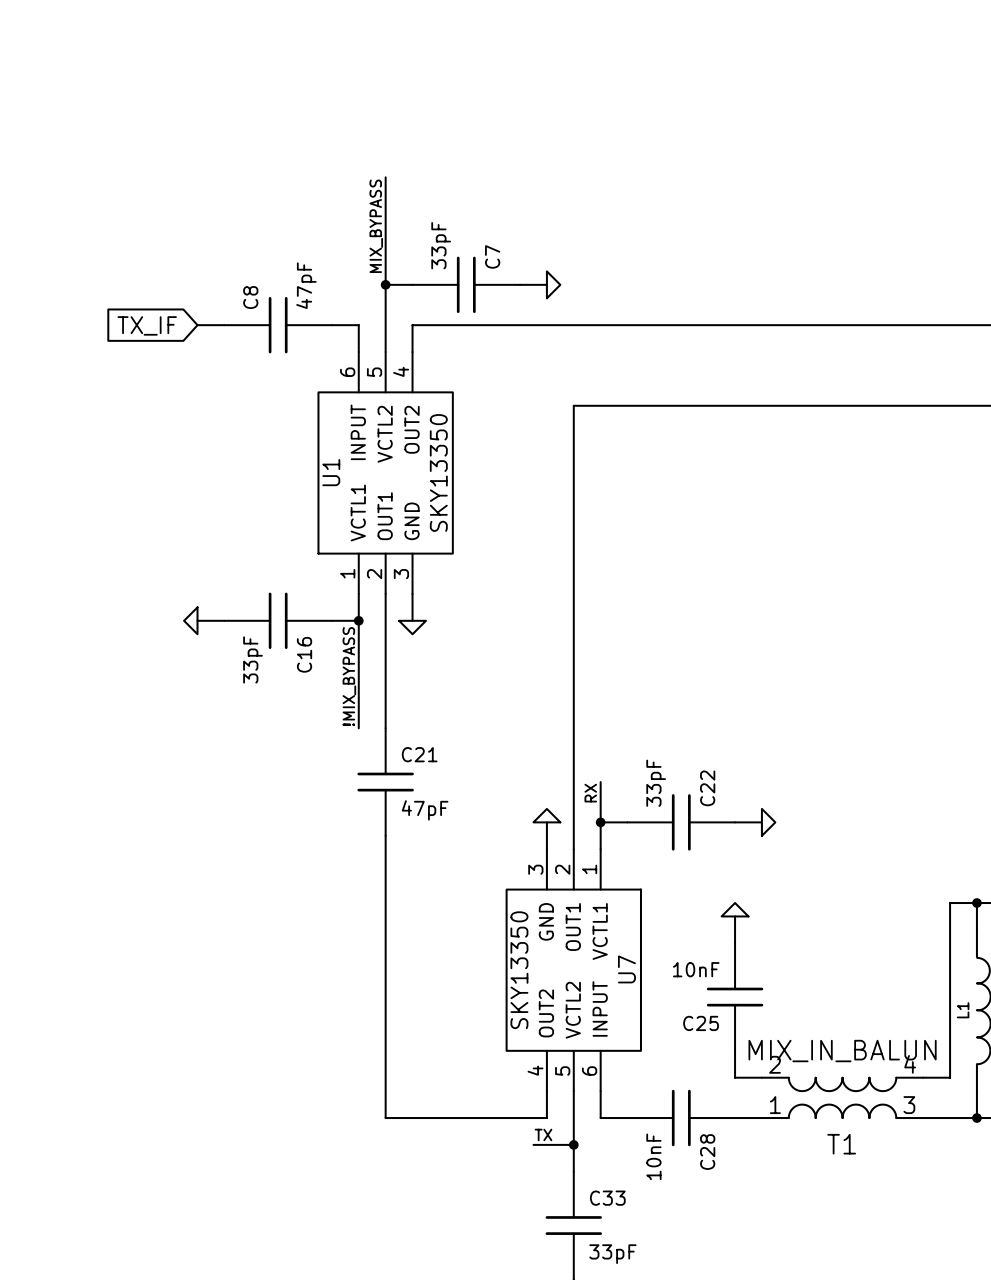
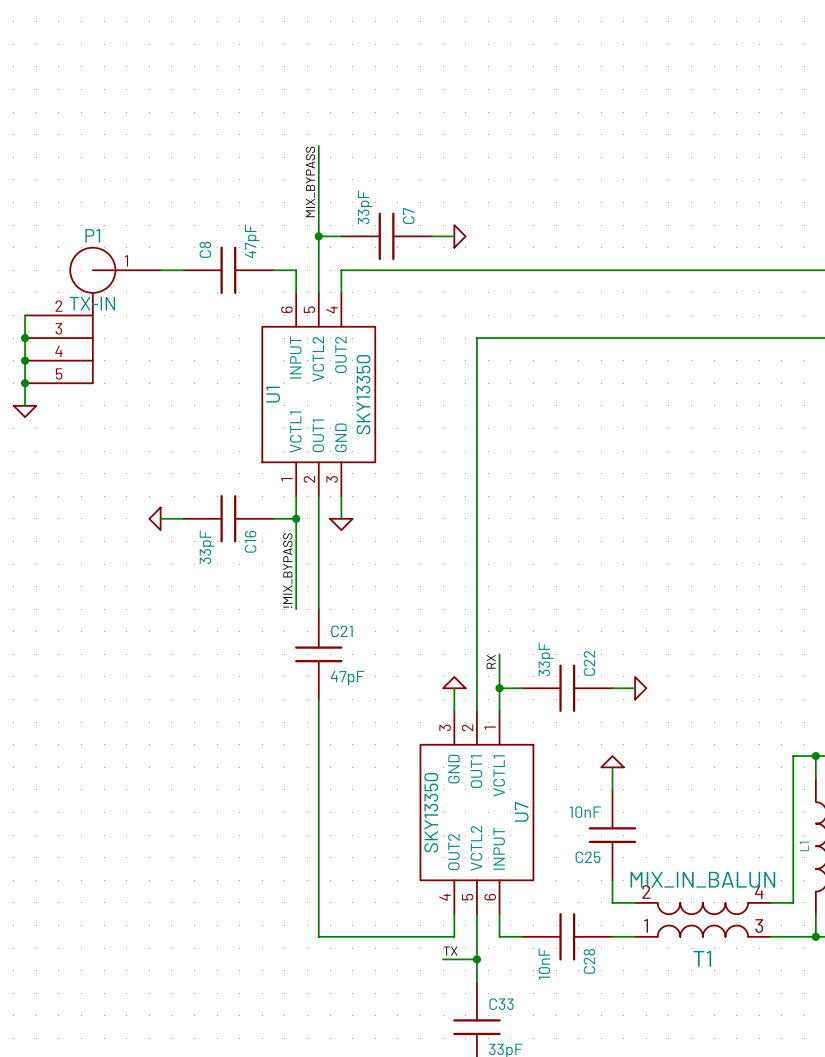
global label: TX_IF (147, 325) -> none
wire: none -> (25, 315) (25, 405)
P1: none -> TX-IN (92, 315)
junction: none -> (25, 338)
junction: none -> (25, 360)
junction: none -> (25, 383)
power symbol: none -> (25, 411)

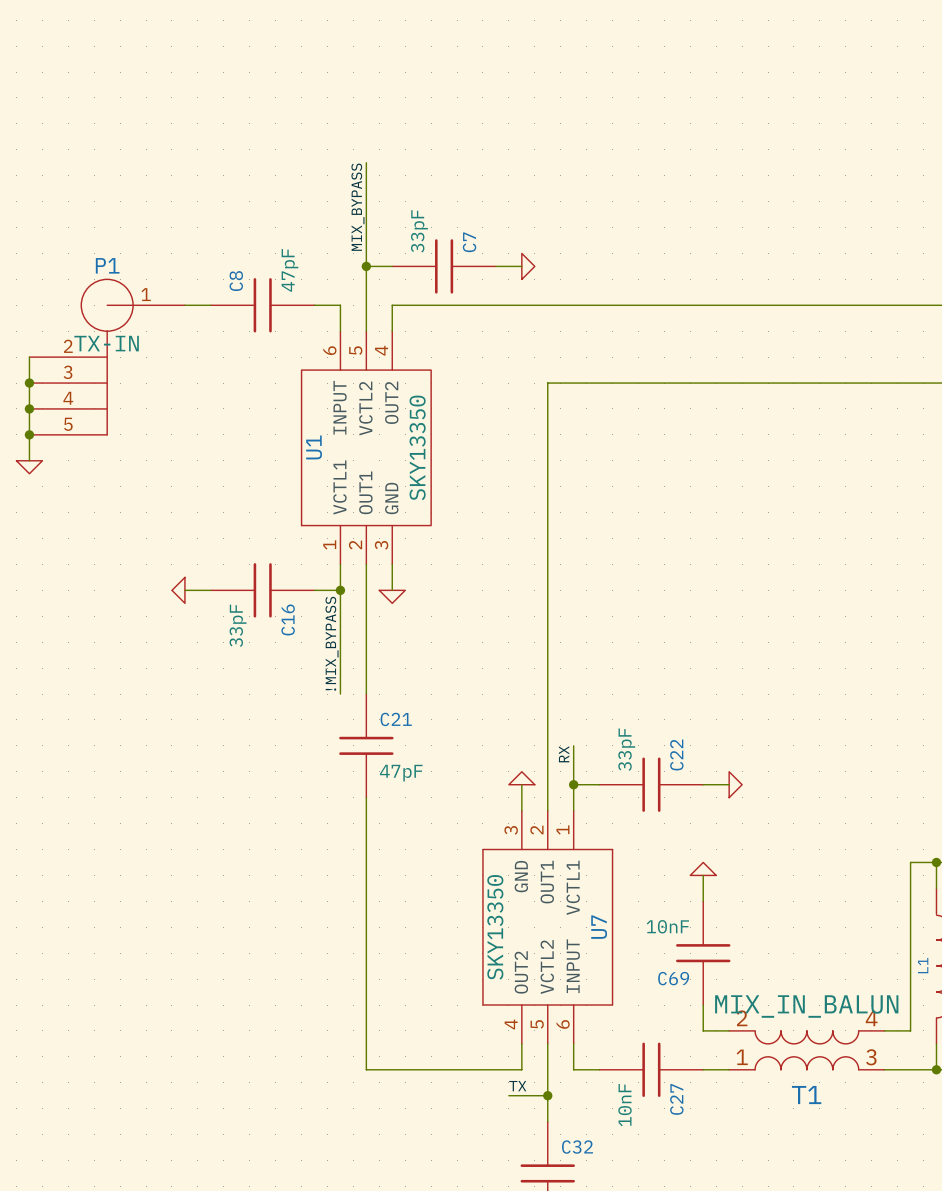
C25 name: C25 (588, 857) -> C69 (673, 978)
C28 name: C28 (589, 961) -> C27 (676, 1099)
C33 name: C33 (501, 1004) -> C32 (577, 1147)

